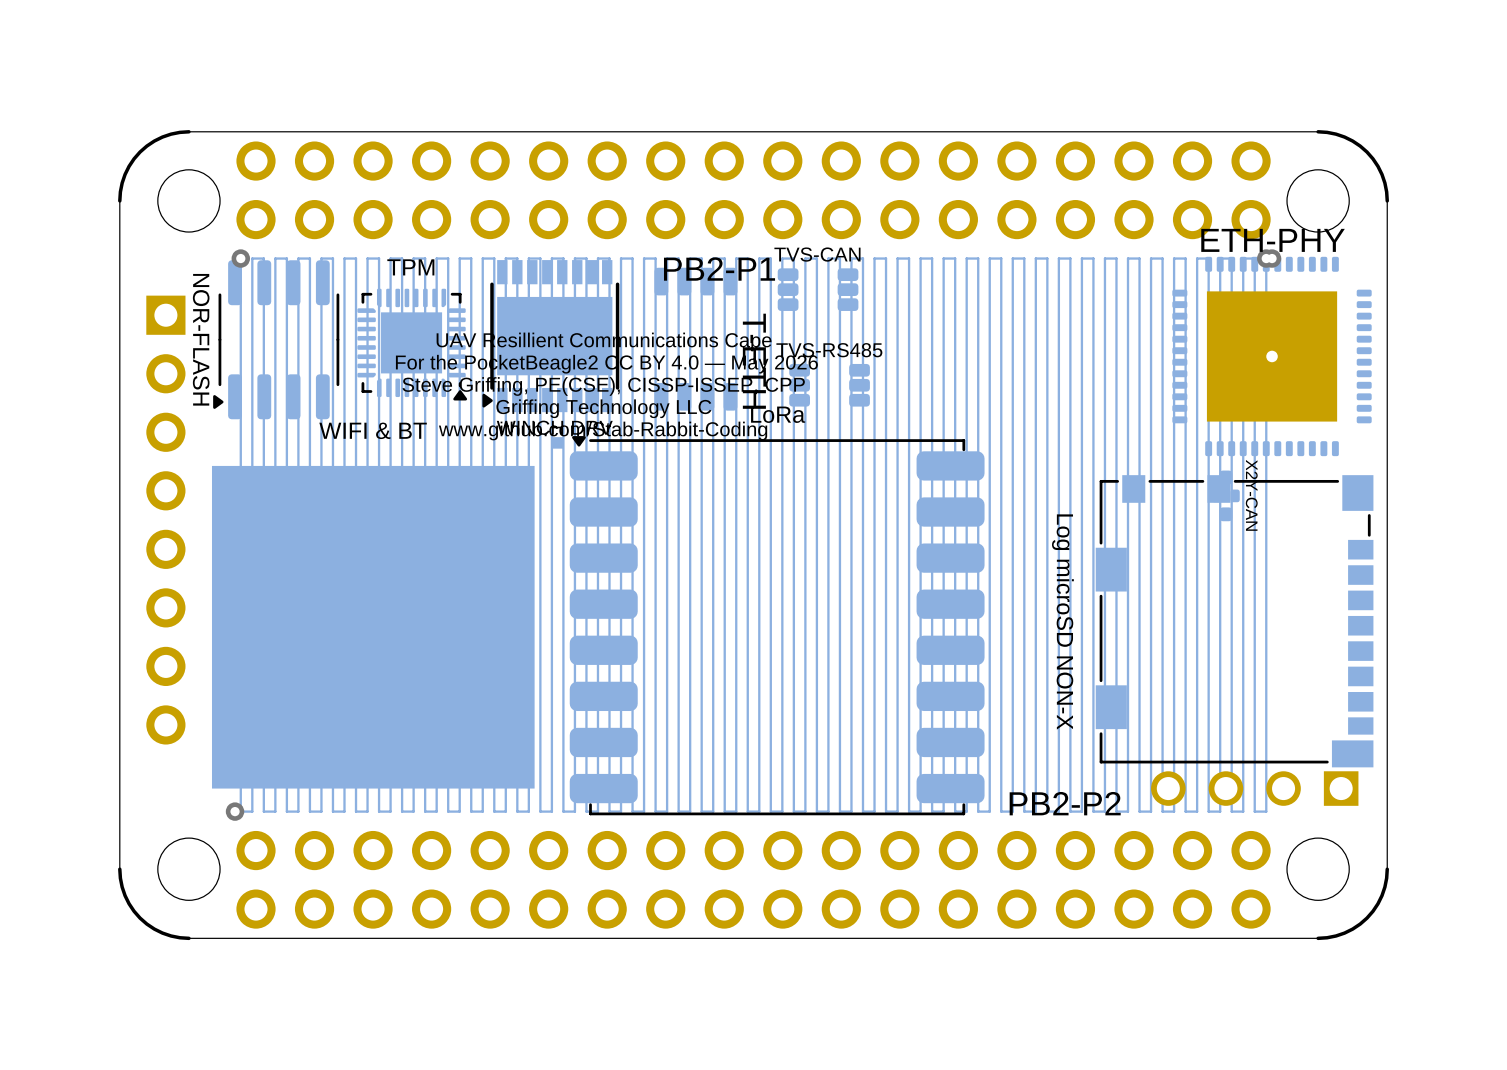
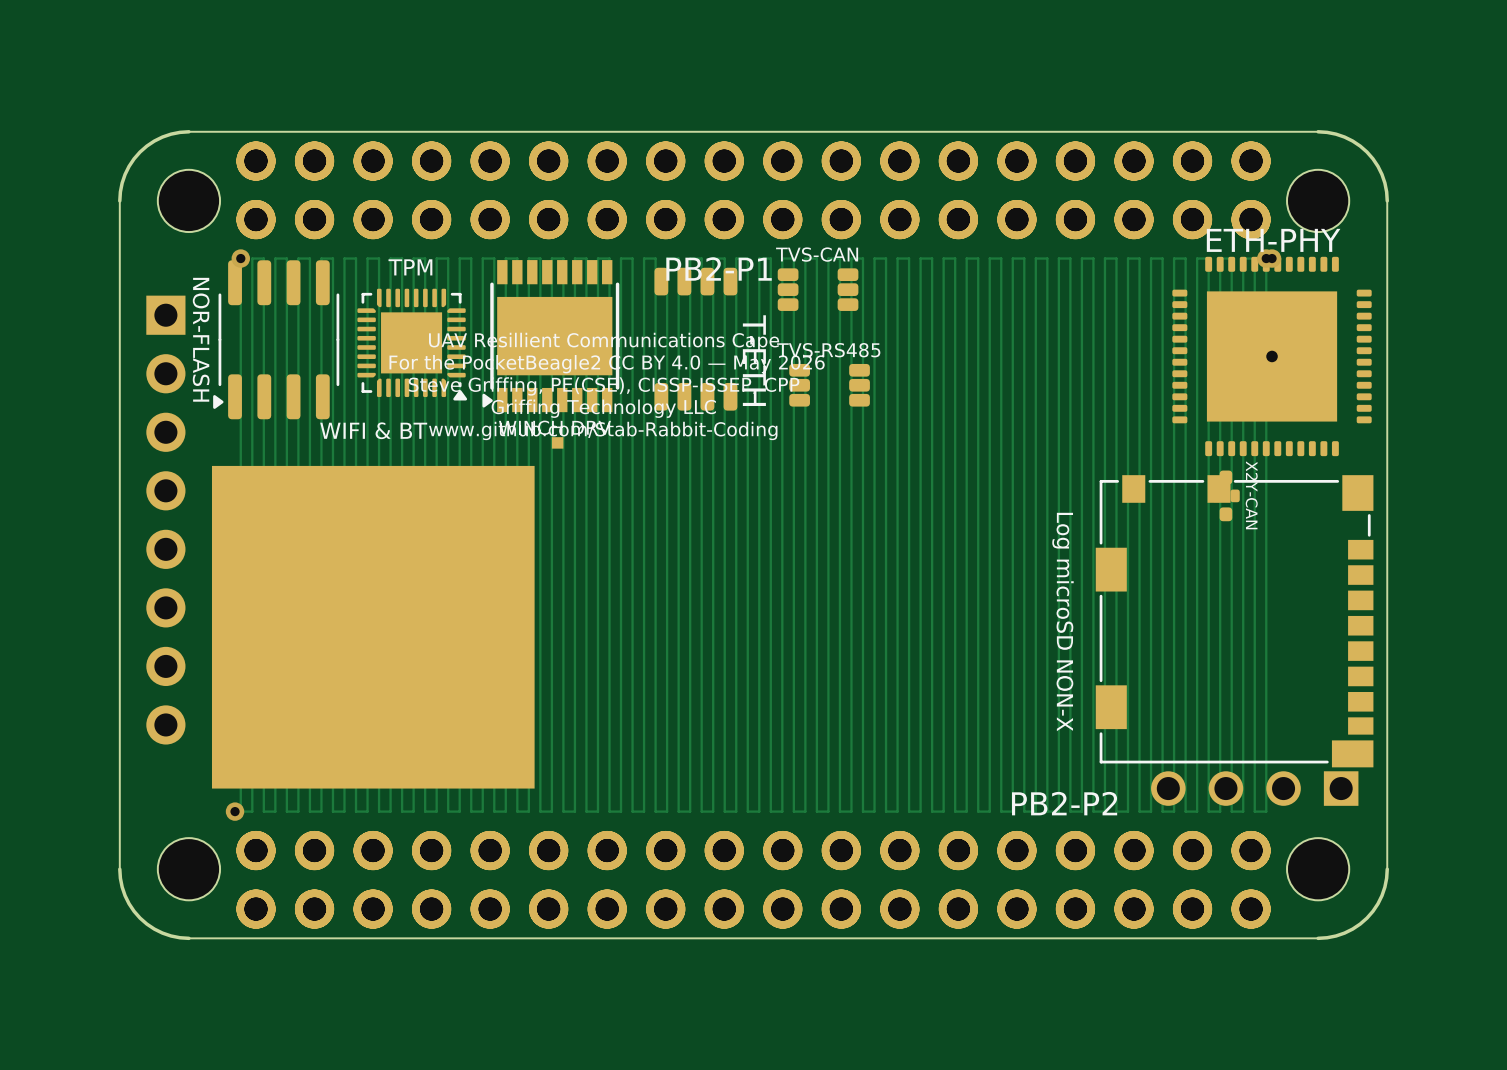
part: none -> (753, 190)
LoRa: (777, 625) -> none
part: none -> (753, 879)

